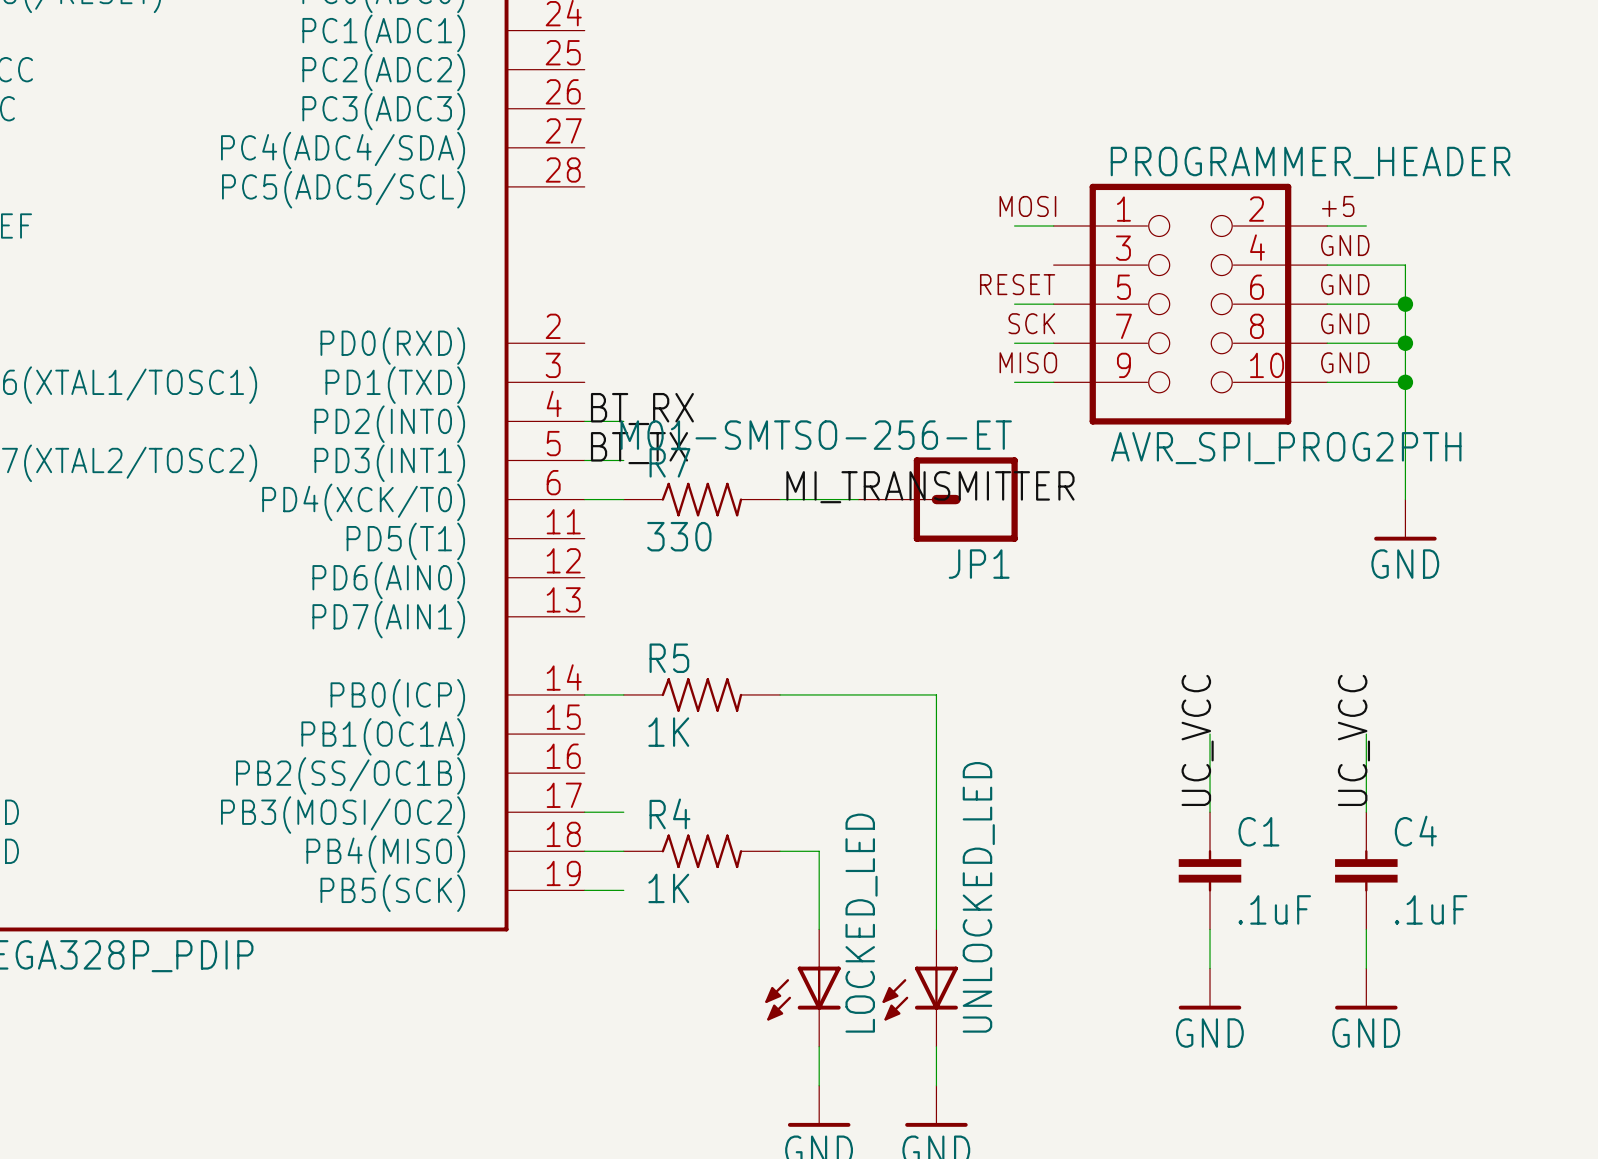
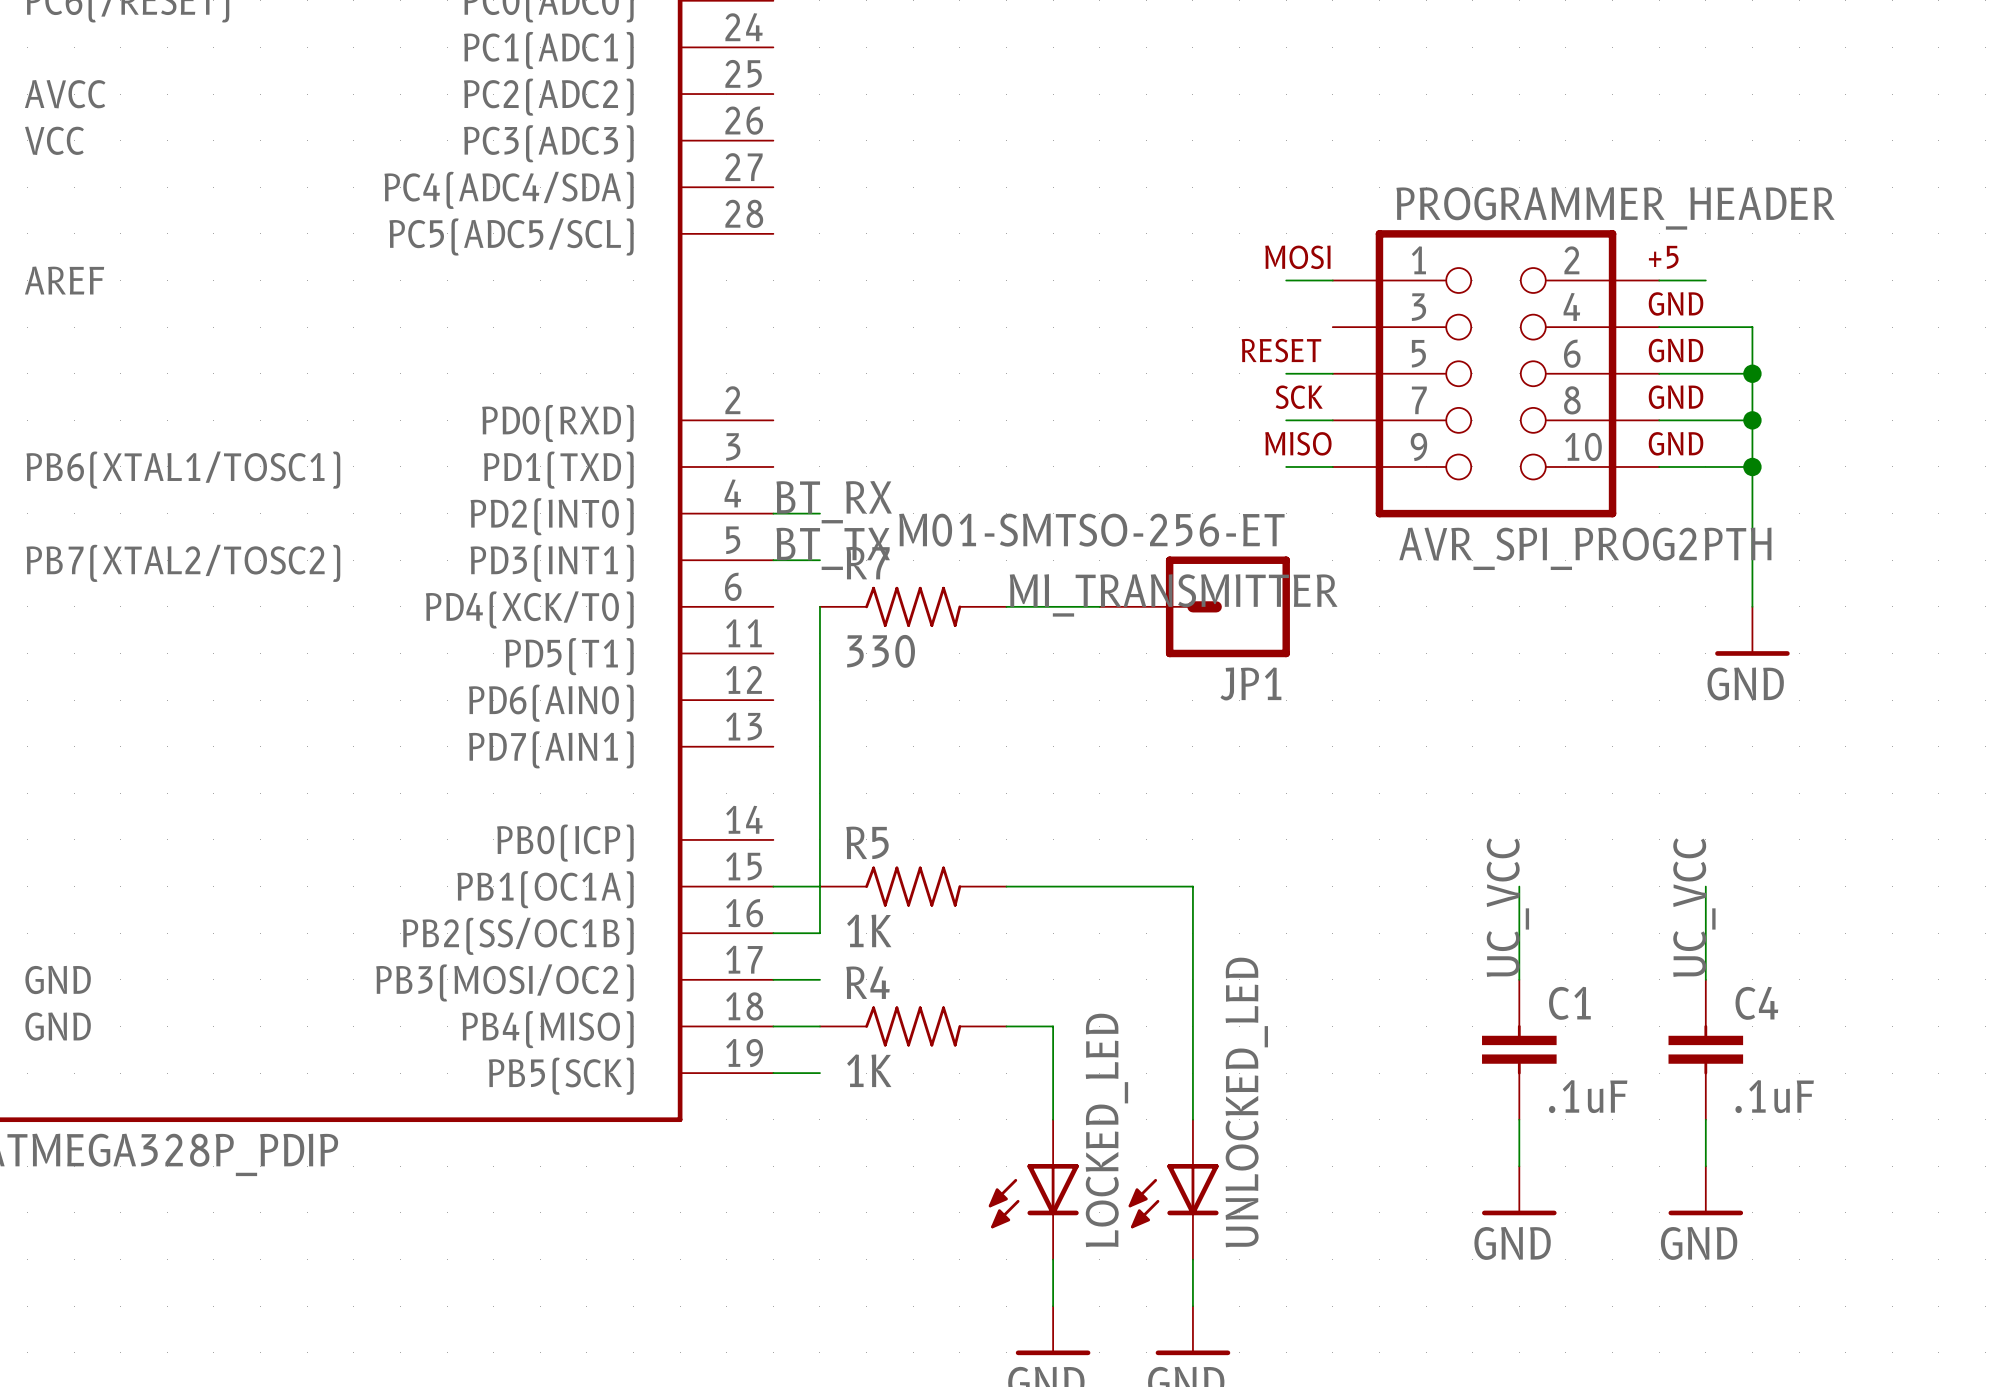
wire: (584, 499) (623, 499) -> (773, 933) (819, 933) (819, 606)
wire: (584, 694) (623, 694) -> (773, 886) (819, 886)
R5 position: (701, 694) -> (913, 886)
wire: (780, 694) (936, 694) (936, 734) -> (1006, 886) (1192, 886)

